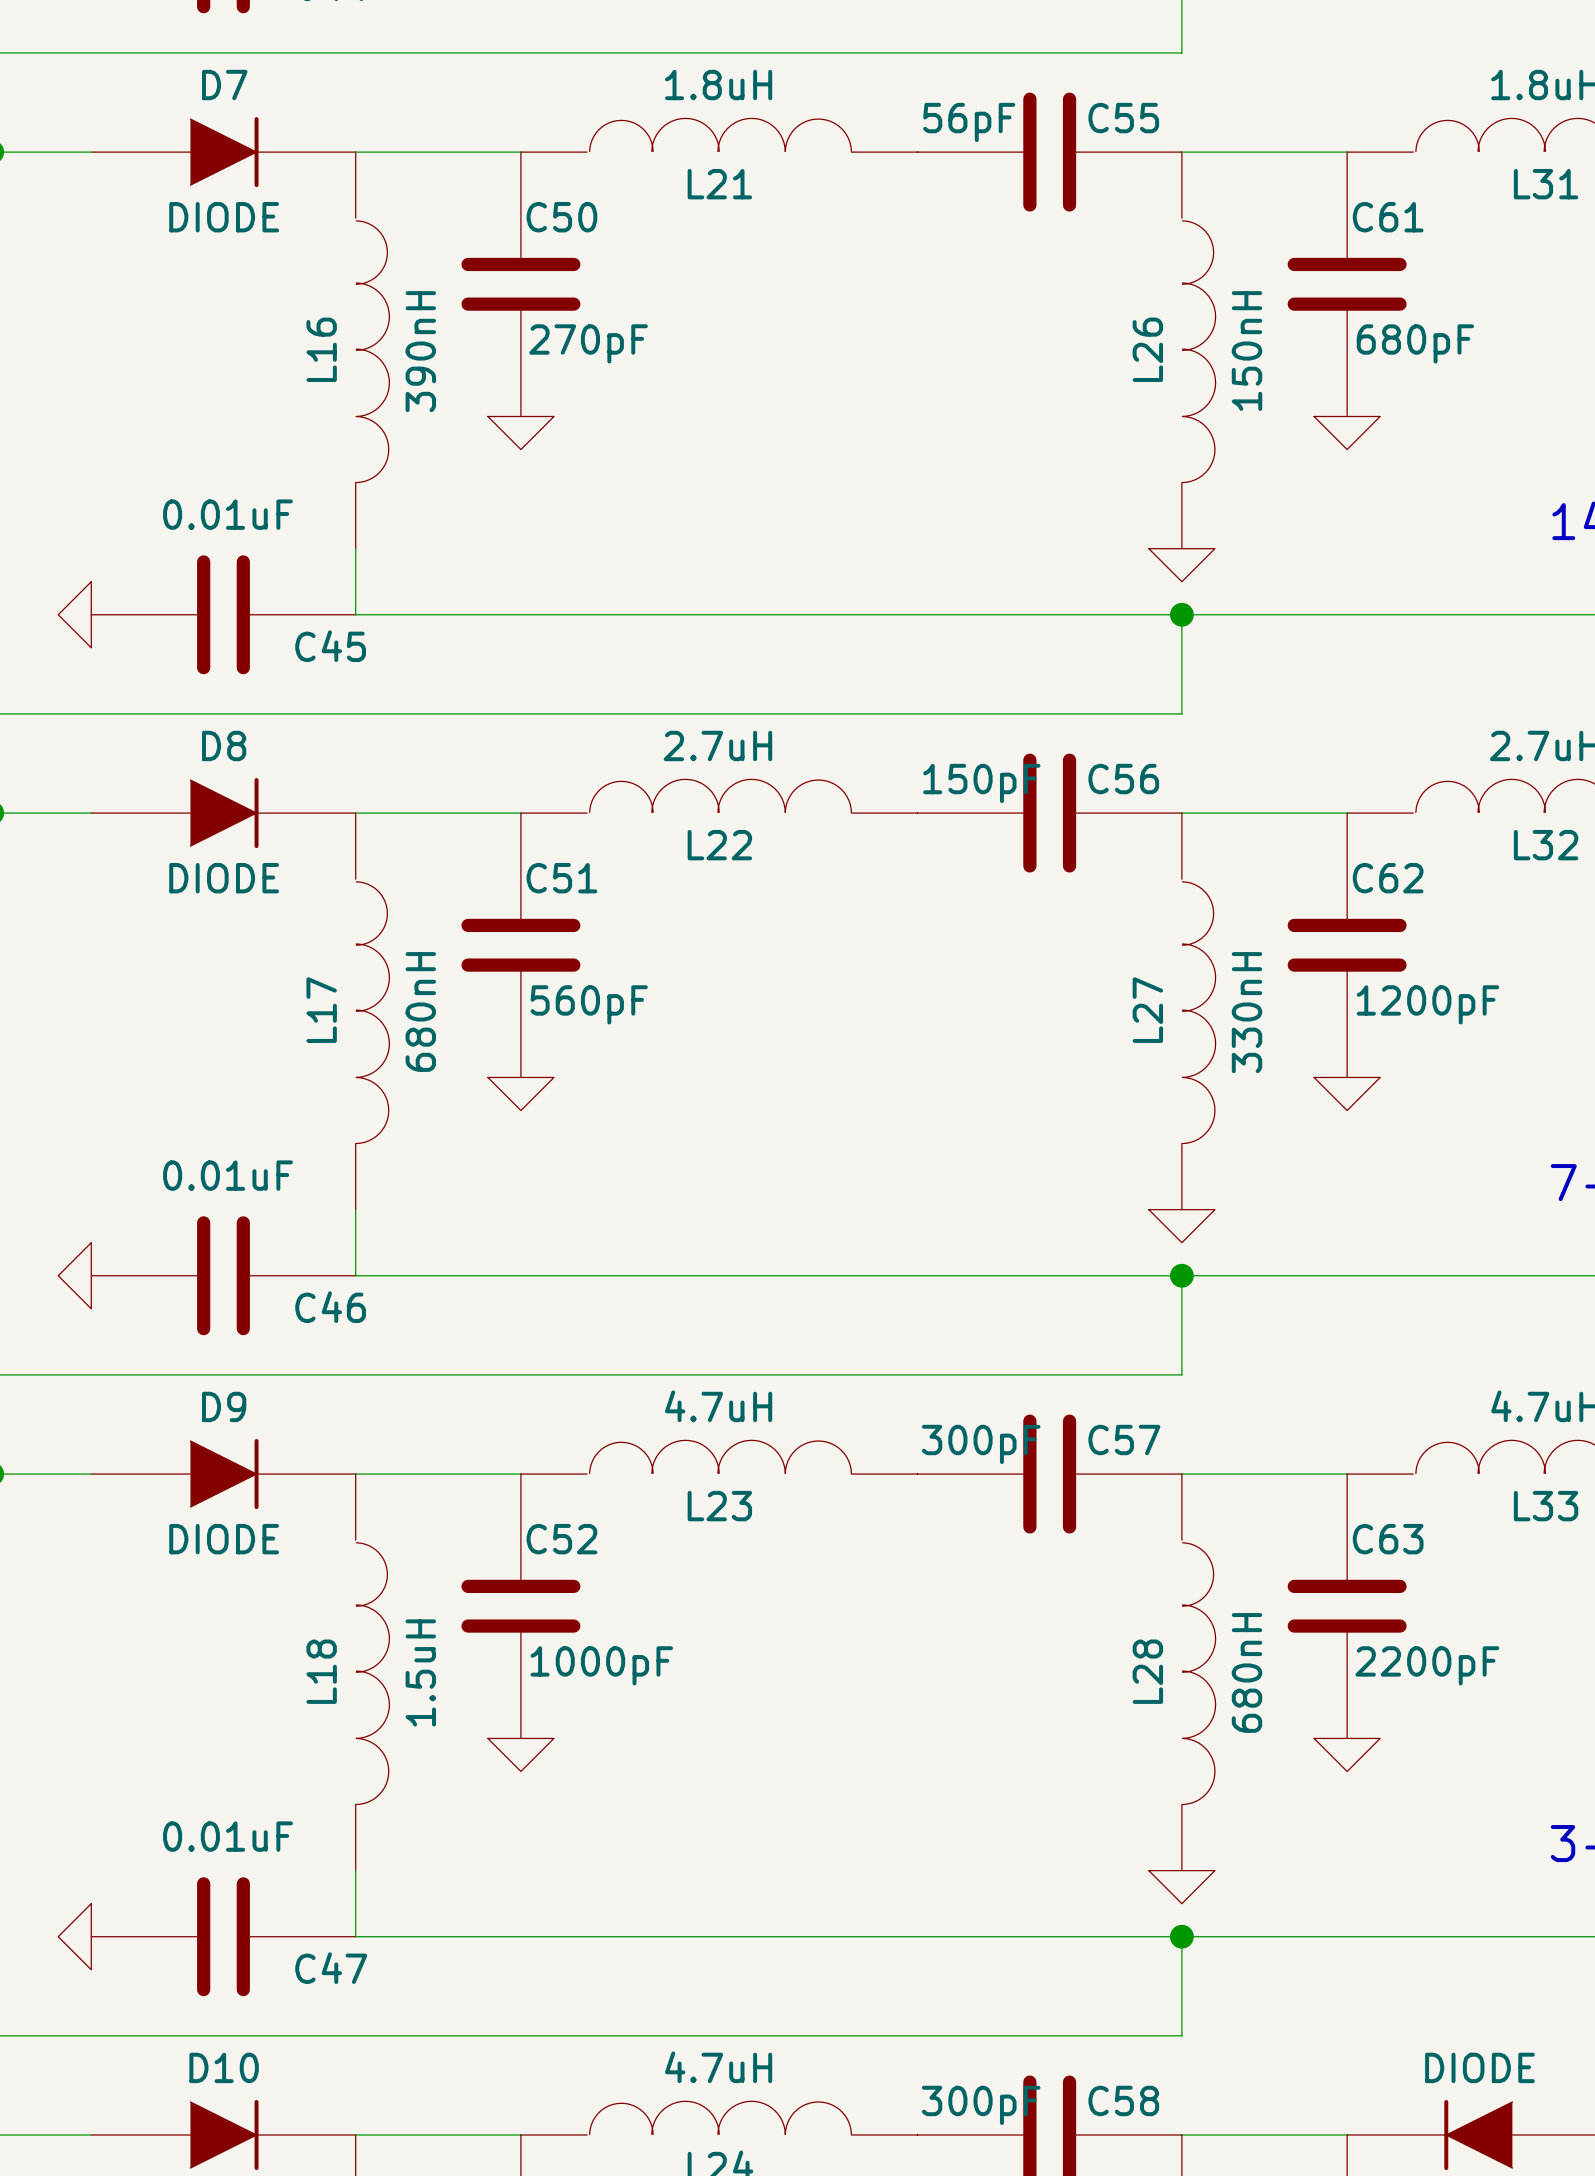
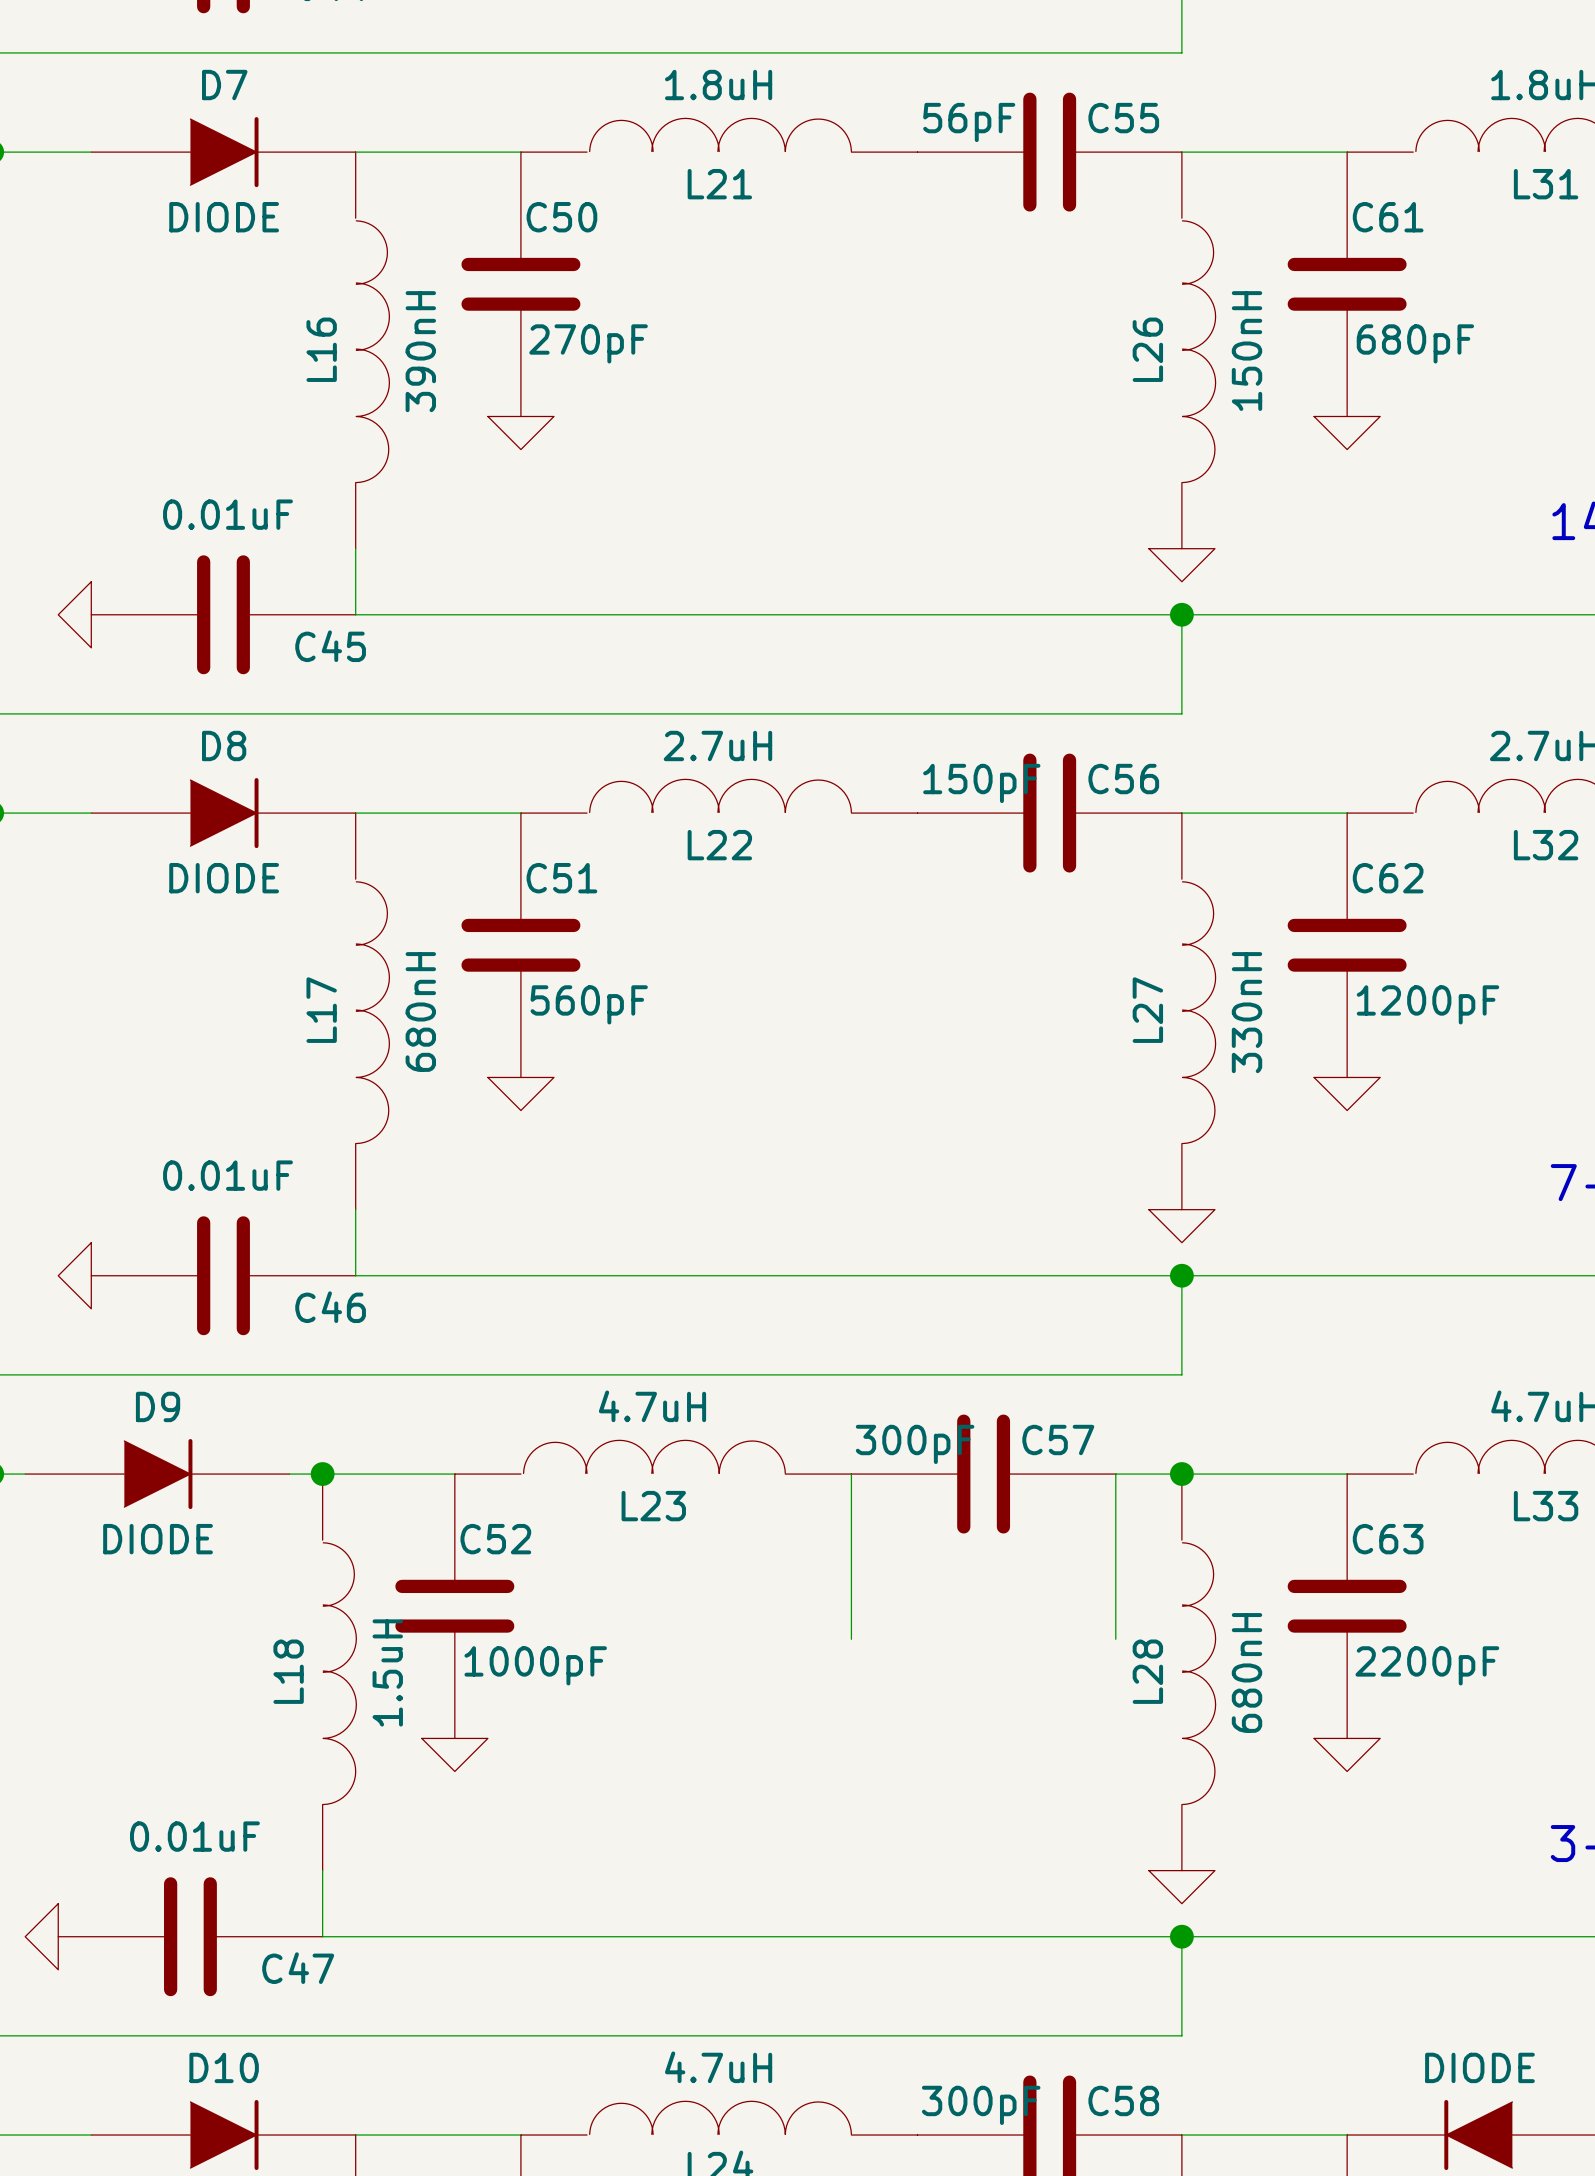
L23 position: (719, 1457) -> (653, 1457)
D9 position: (223, 1474) -> (157, 1474)
junction: none -> (322, 1474)
wire: none -> (851, 1474) (851, 1639)
C57 position: (1049, 1474) -> (983, 1474)
wire: none -> (1181, 1474) (1115, 1474) (1115, 1639)
junction: none -> (1181, 1474)
C52 position: (520, 1606) -> (454, 1606)
L18 position: (372, 1672) -> (339, 1672)
power symbol position: (520, 1754) -> (454, 1754)
wire: (355, 1870) (355, 1936) -> (322, 1870) (322, 1936) (355, 1936)
power symbol position: (74, 1936) -> (41, 1936)
C47 position: (223, 1936) -> (190, 1936)

